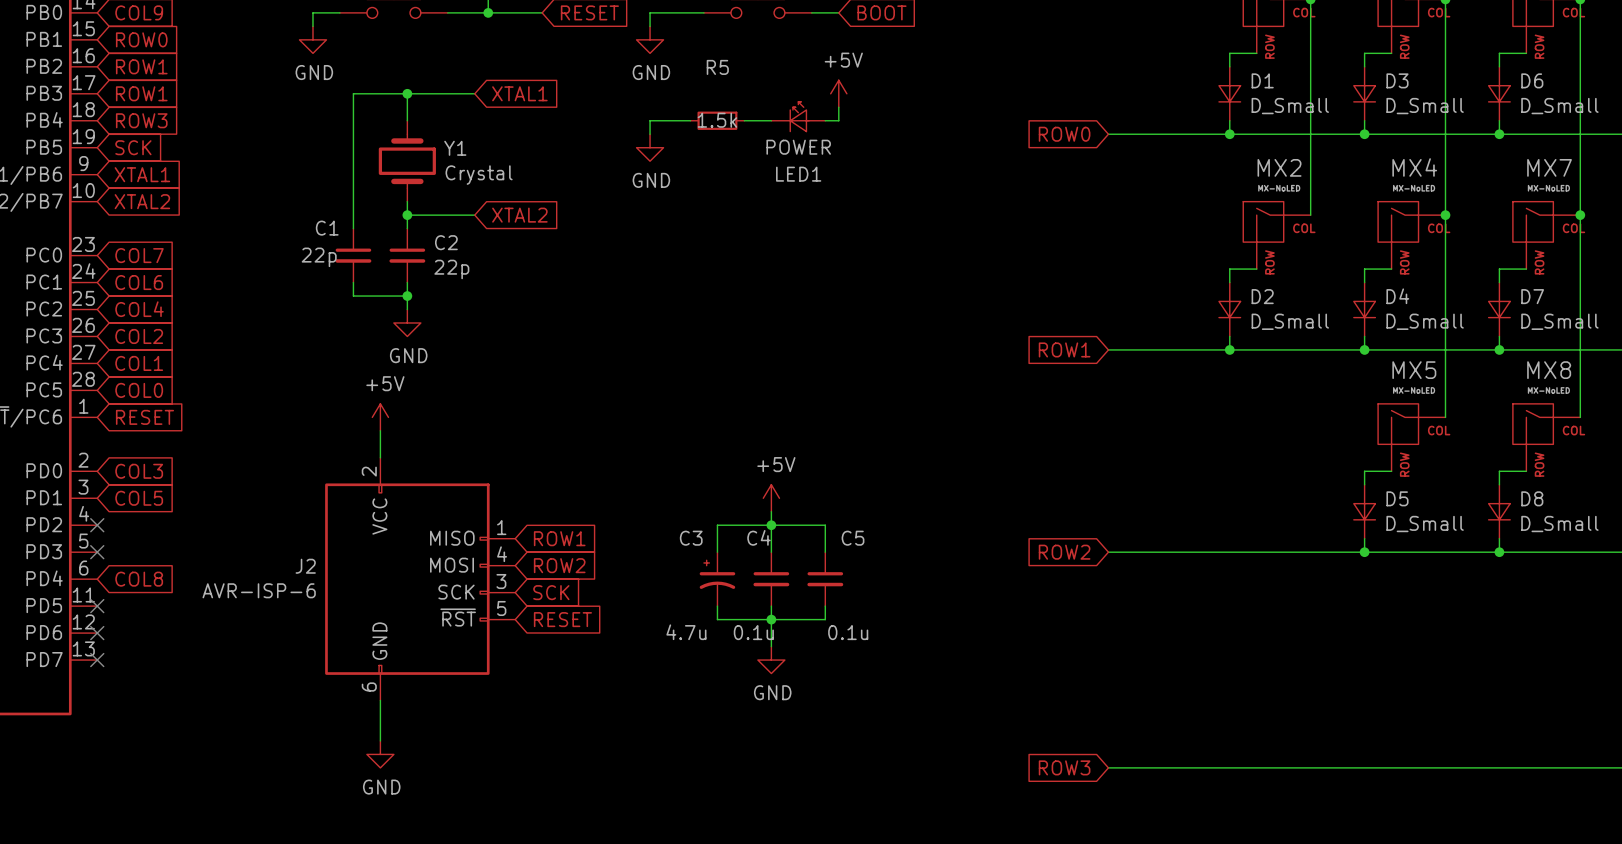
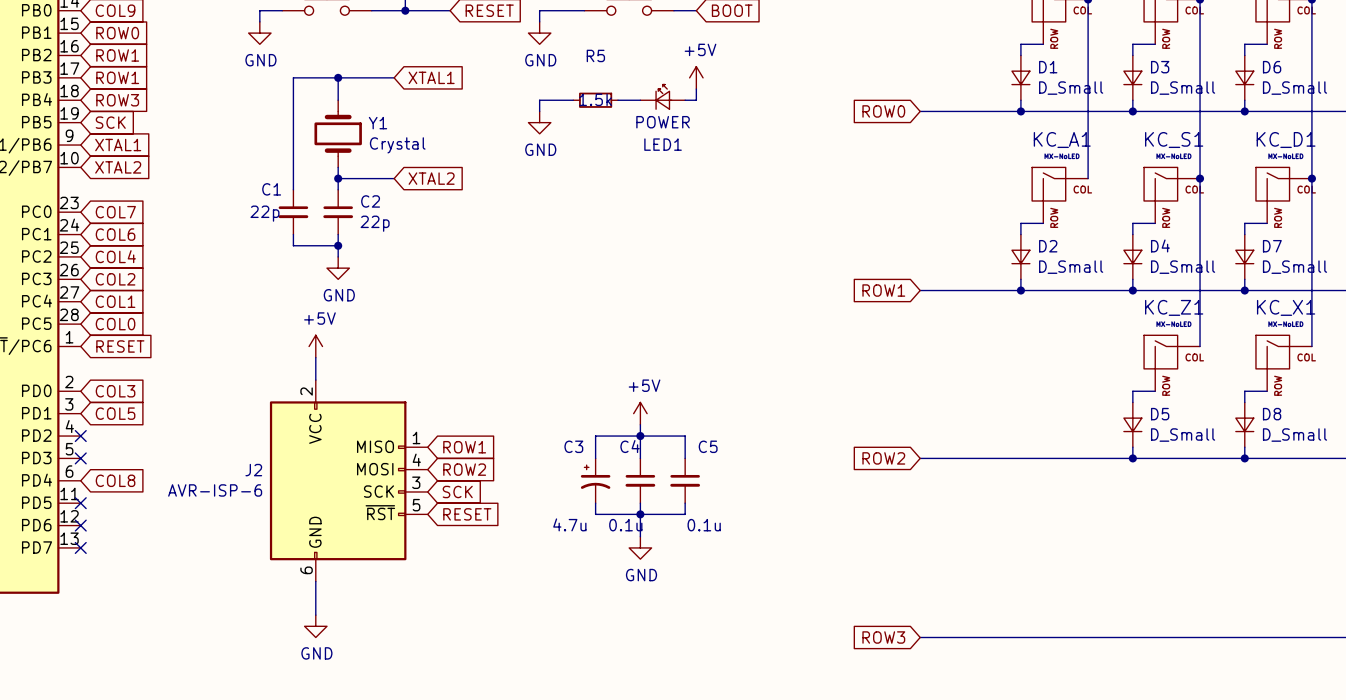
MX2 name: MX2 (1279, 167) -> KC_A1 (1062, 140)
MX4 name: MX4 (1414, 167) -> KC_S1 (1174, 140)
MX7 name: MX7 (1549, 167) -> KC_D1 (1286, 140)
MX5 name: MX5 (1414, 370) -> KC_Z1 (1174, 307)
MX8 name: MX8 (1549, 370) -> KC_X1 (1286, 307)

